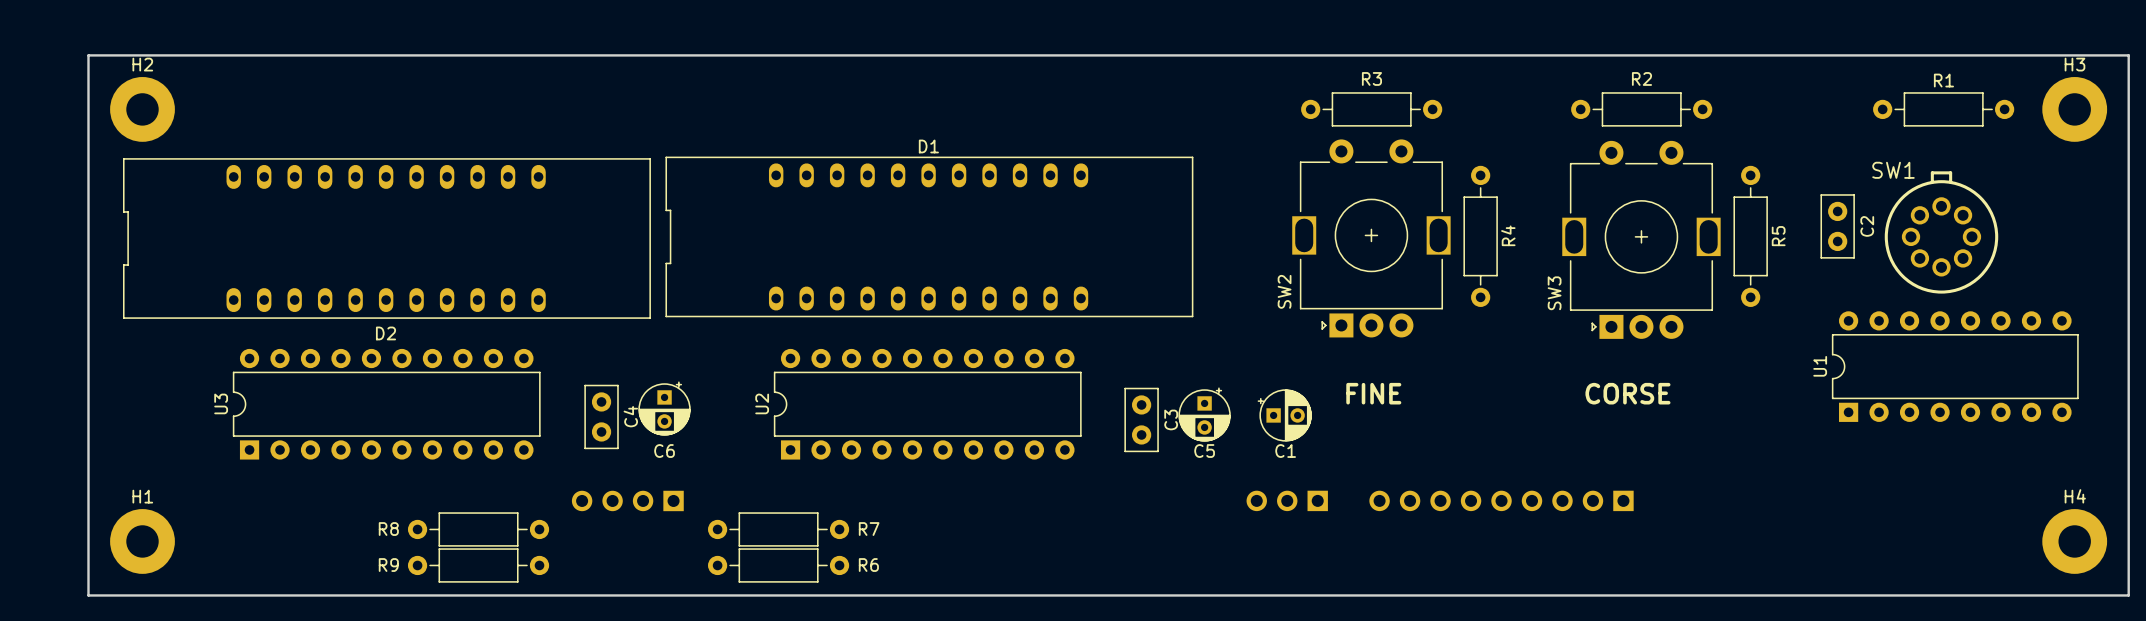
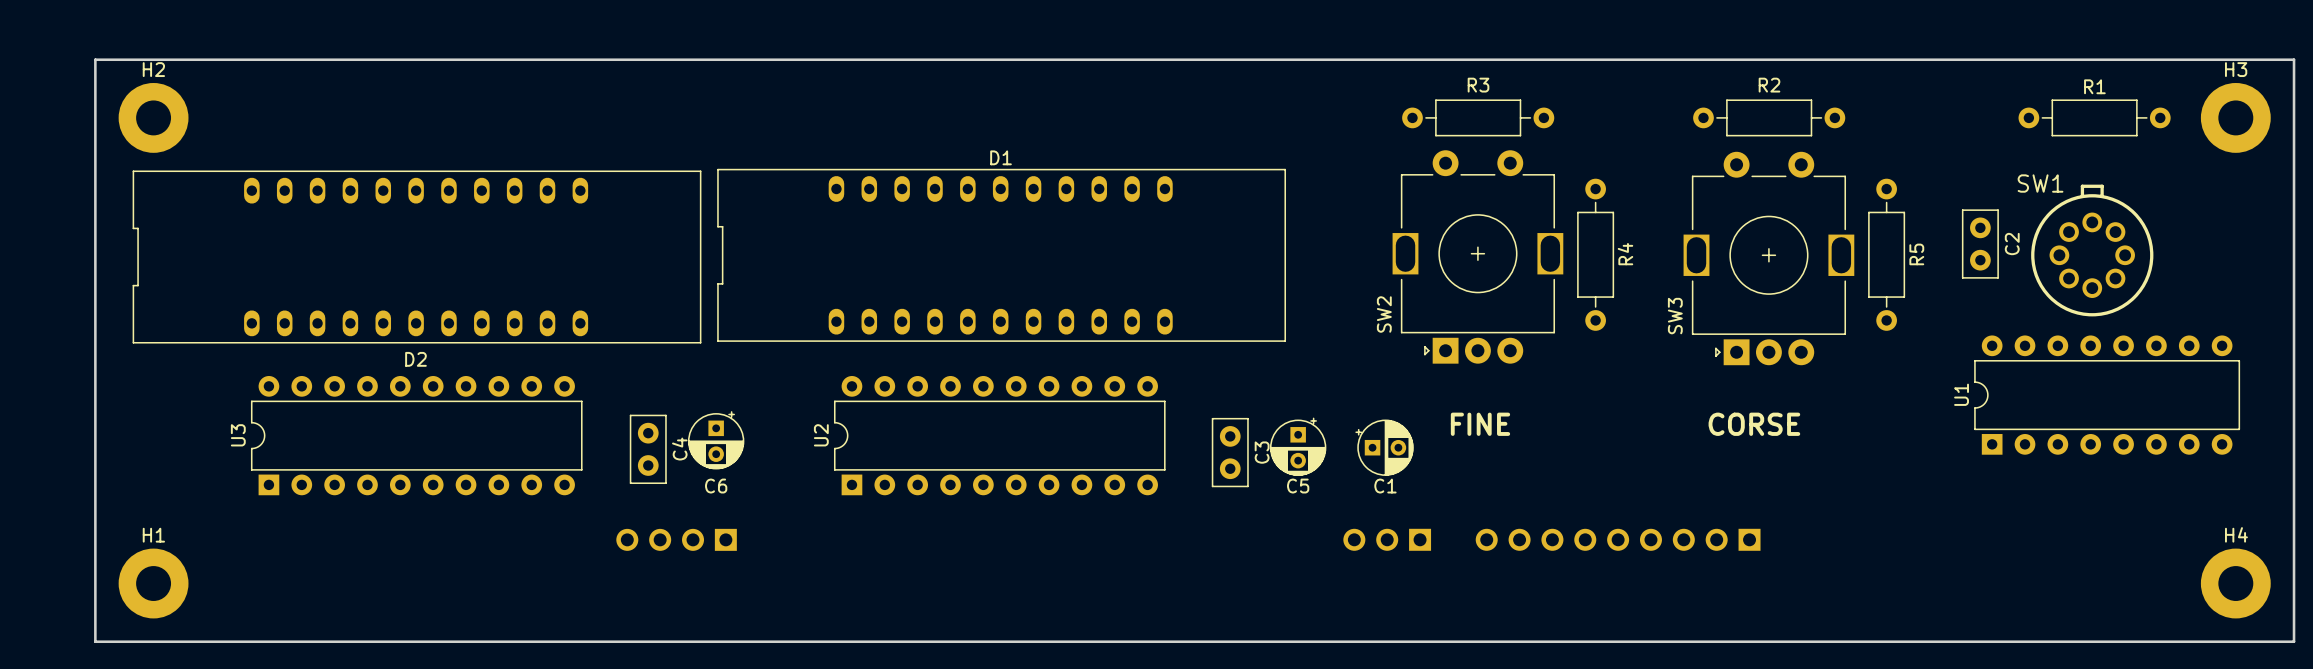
R8: (478, 529) -> none
R7: (778, 529) -> none
R9: (478, 565) -> none
R6: (778, 565) -> none

